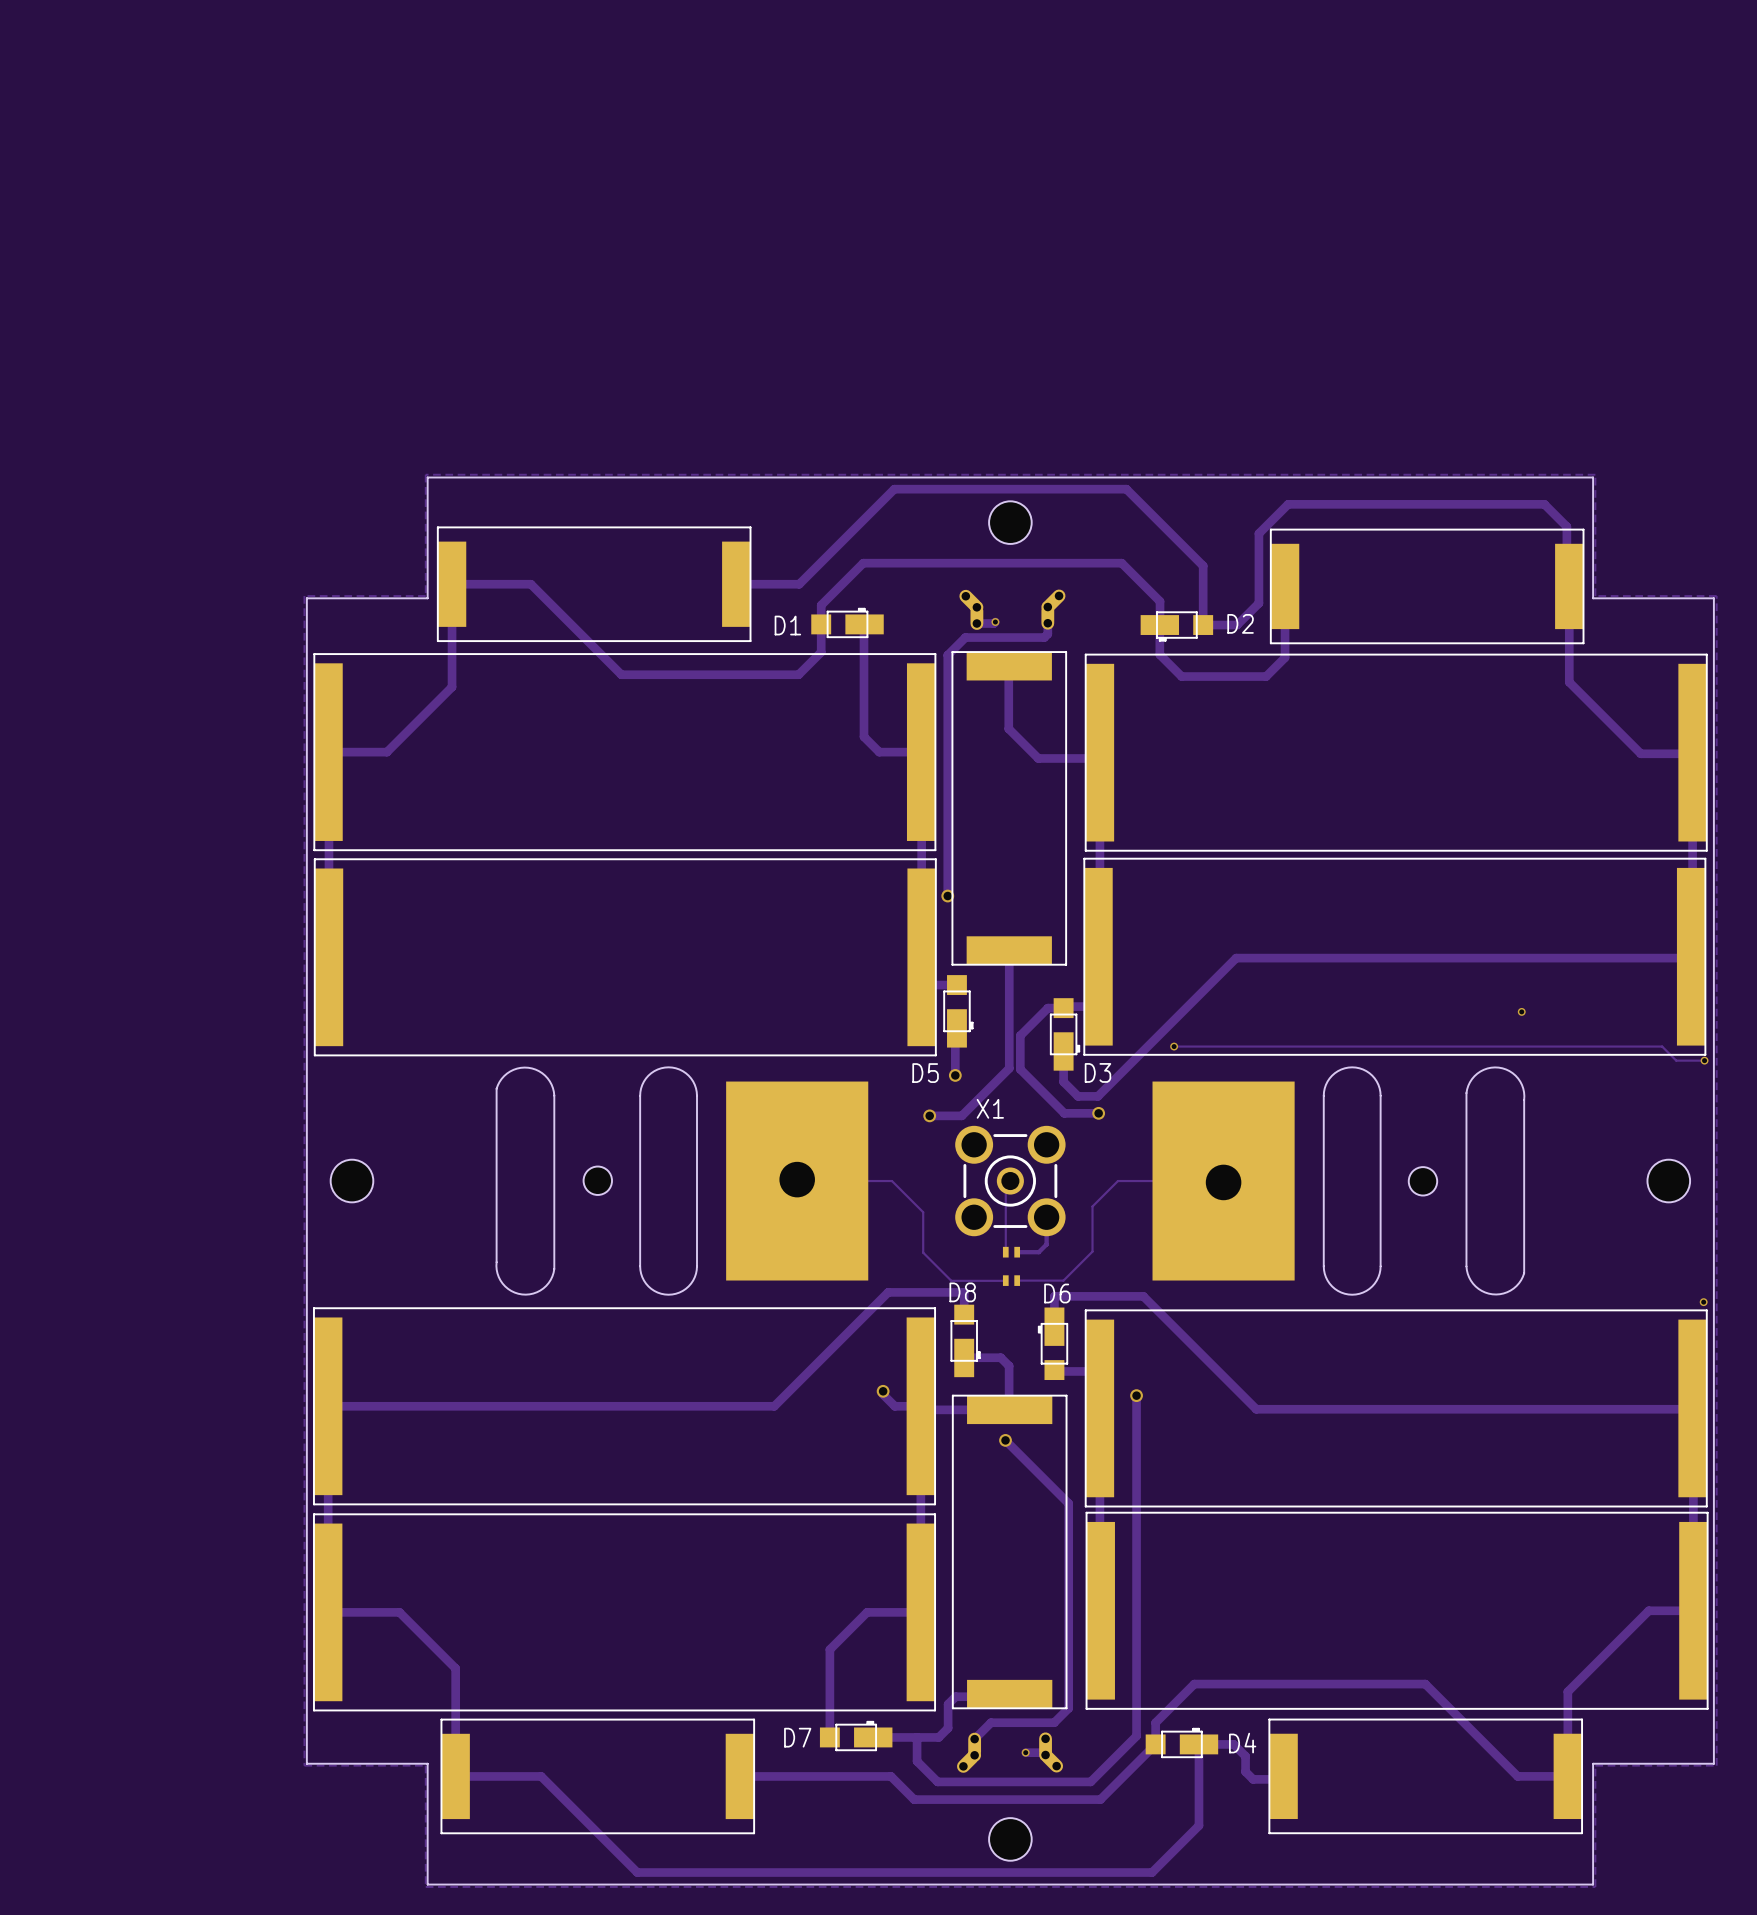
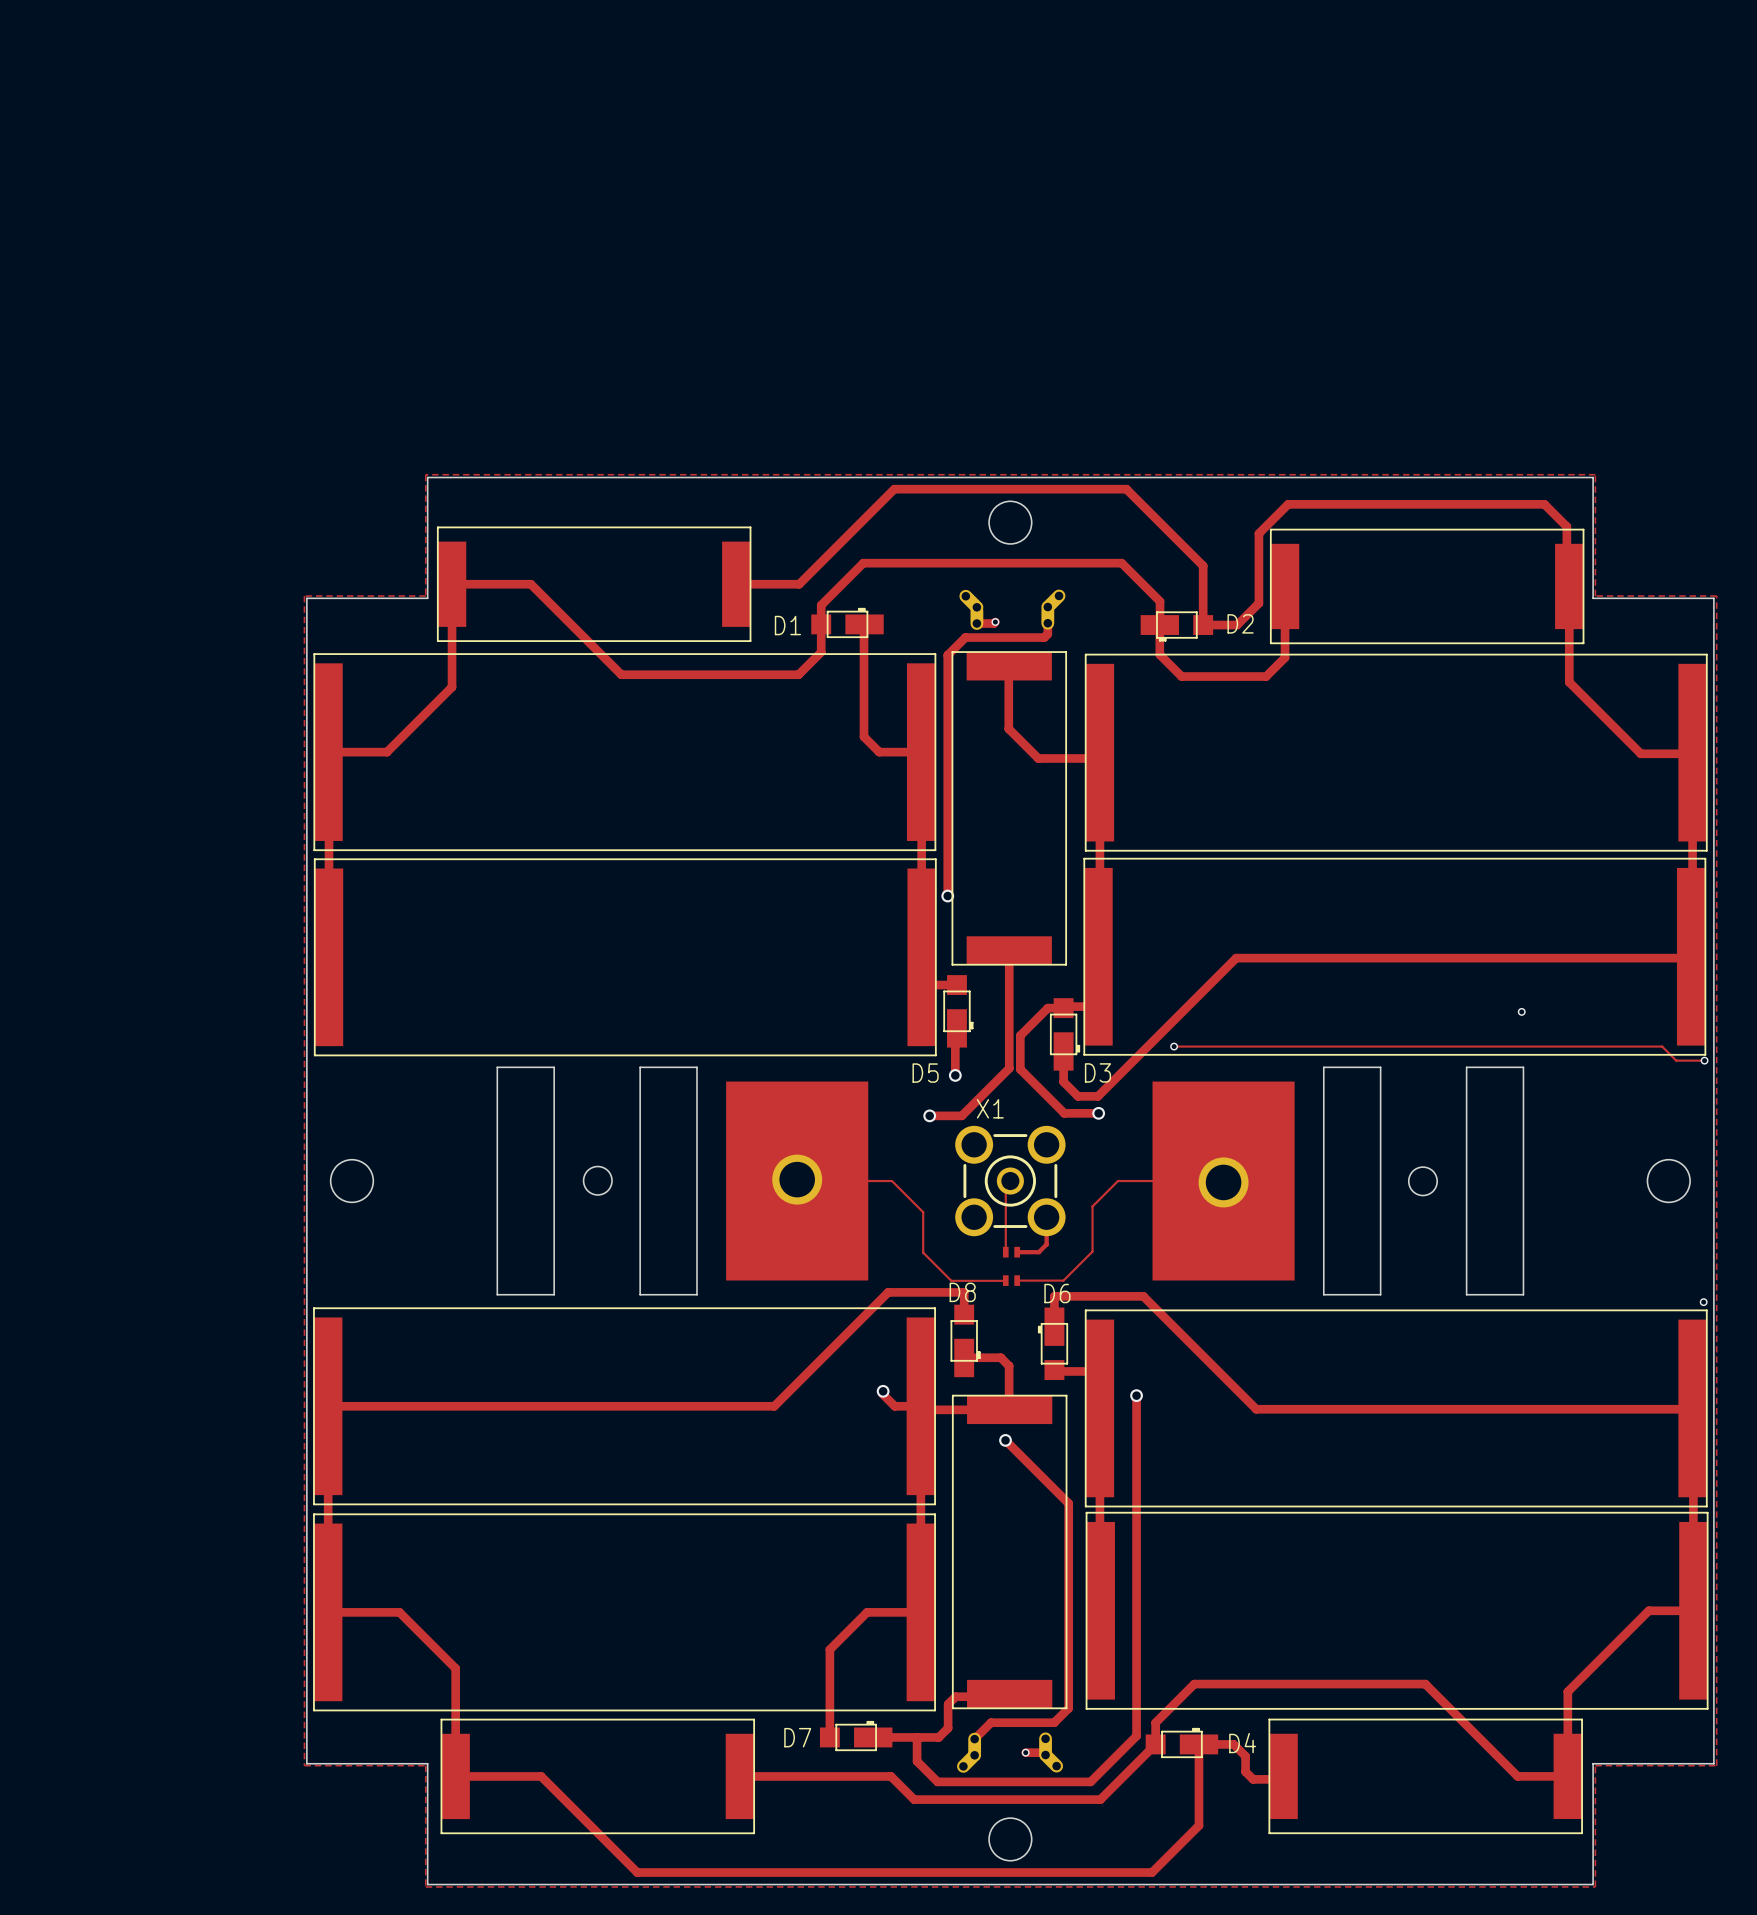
part footprint: [496, 1067, 869, 1295] -> [497, 1067, 869, 1295]
part footprint: [1152, 1067, 1525, 1295] -> [1152, 1067, 1524, 1295]

